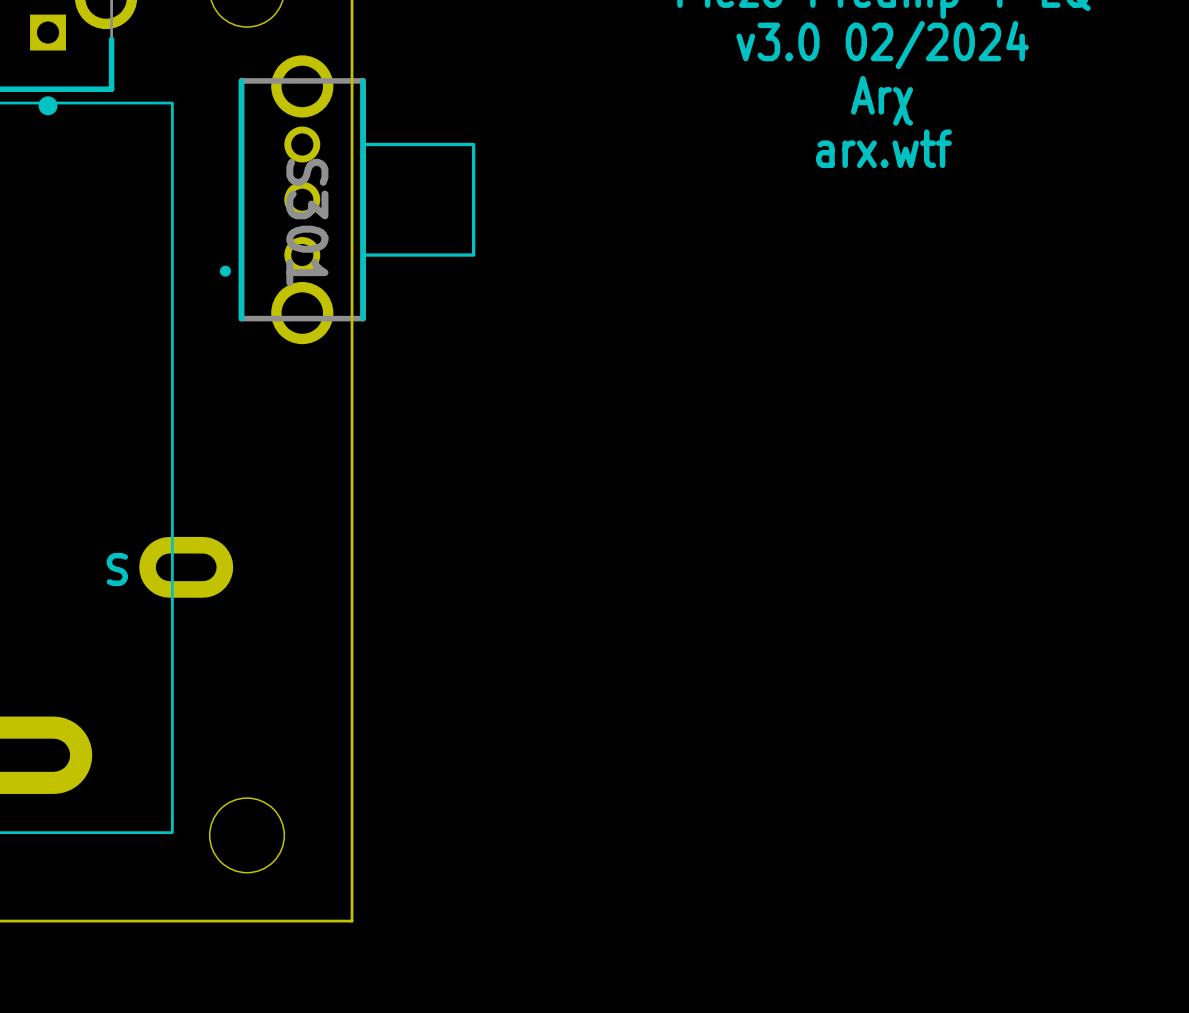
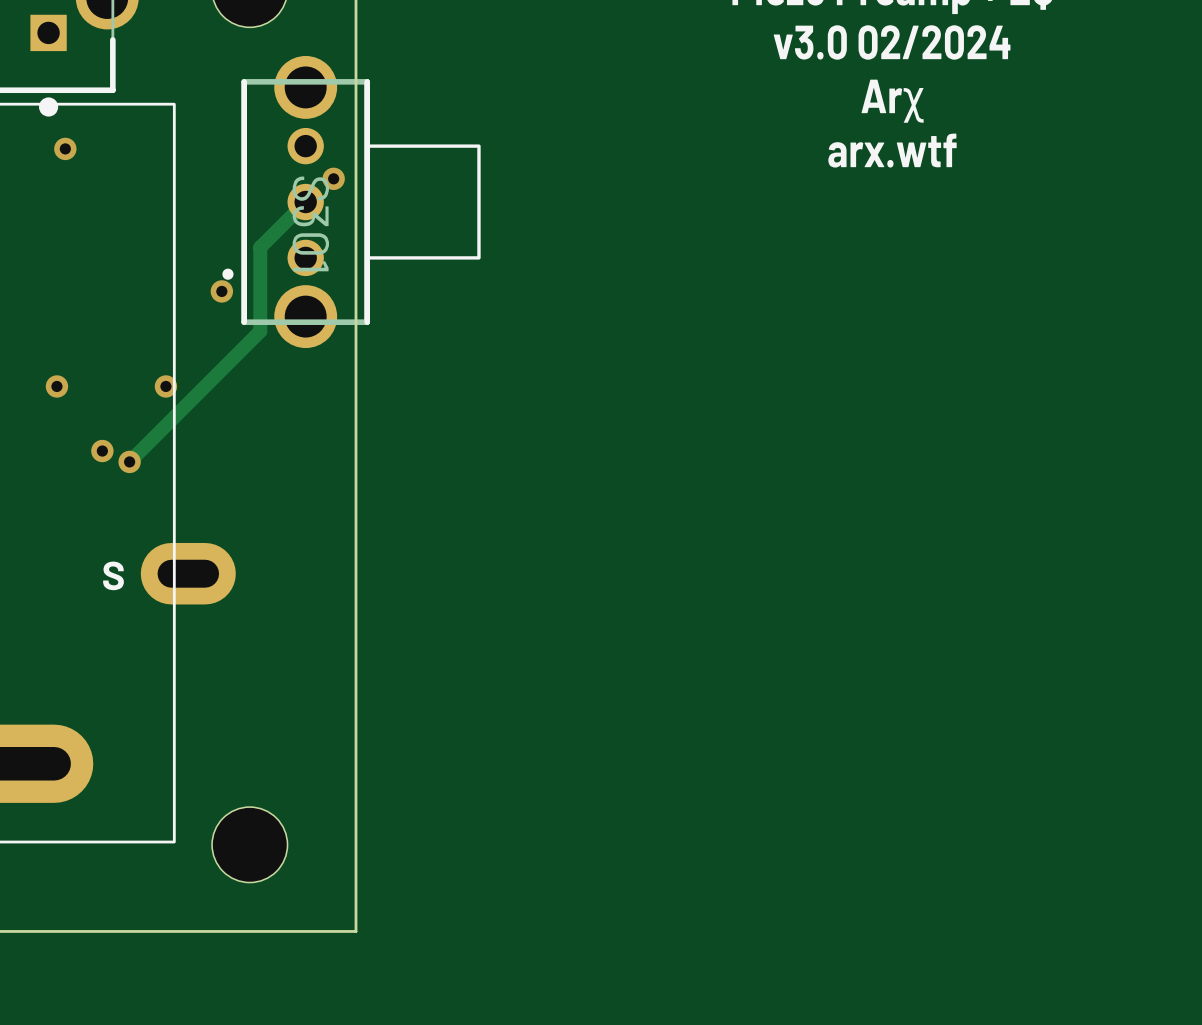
via: none -> (65, 148)
via: none -> (333, 178)
track: none -> (305, 202) (260, 247) (260, 331) (129, 461)
via: none -> (221, 291)
via: none -> (56, 386)
via: none -> (165, 386)
via: none -> (102, 451)
via: none -> (129, 461)

